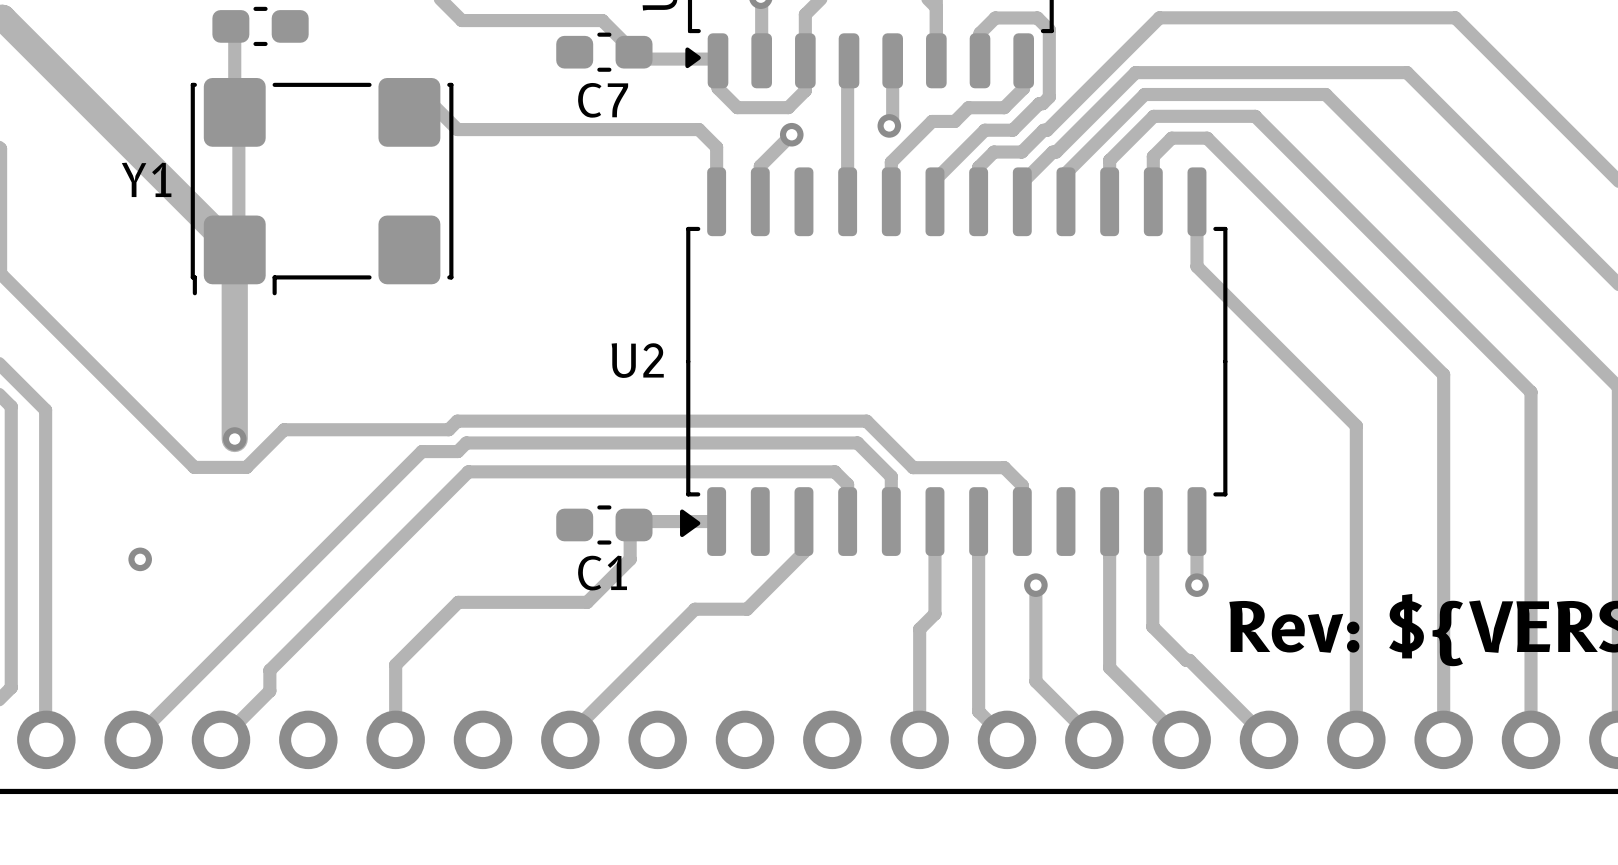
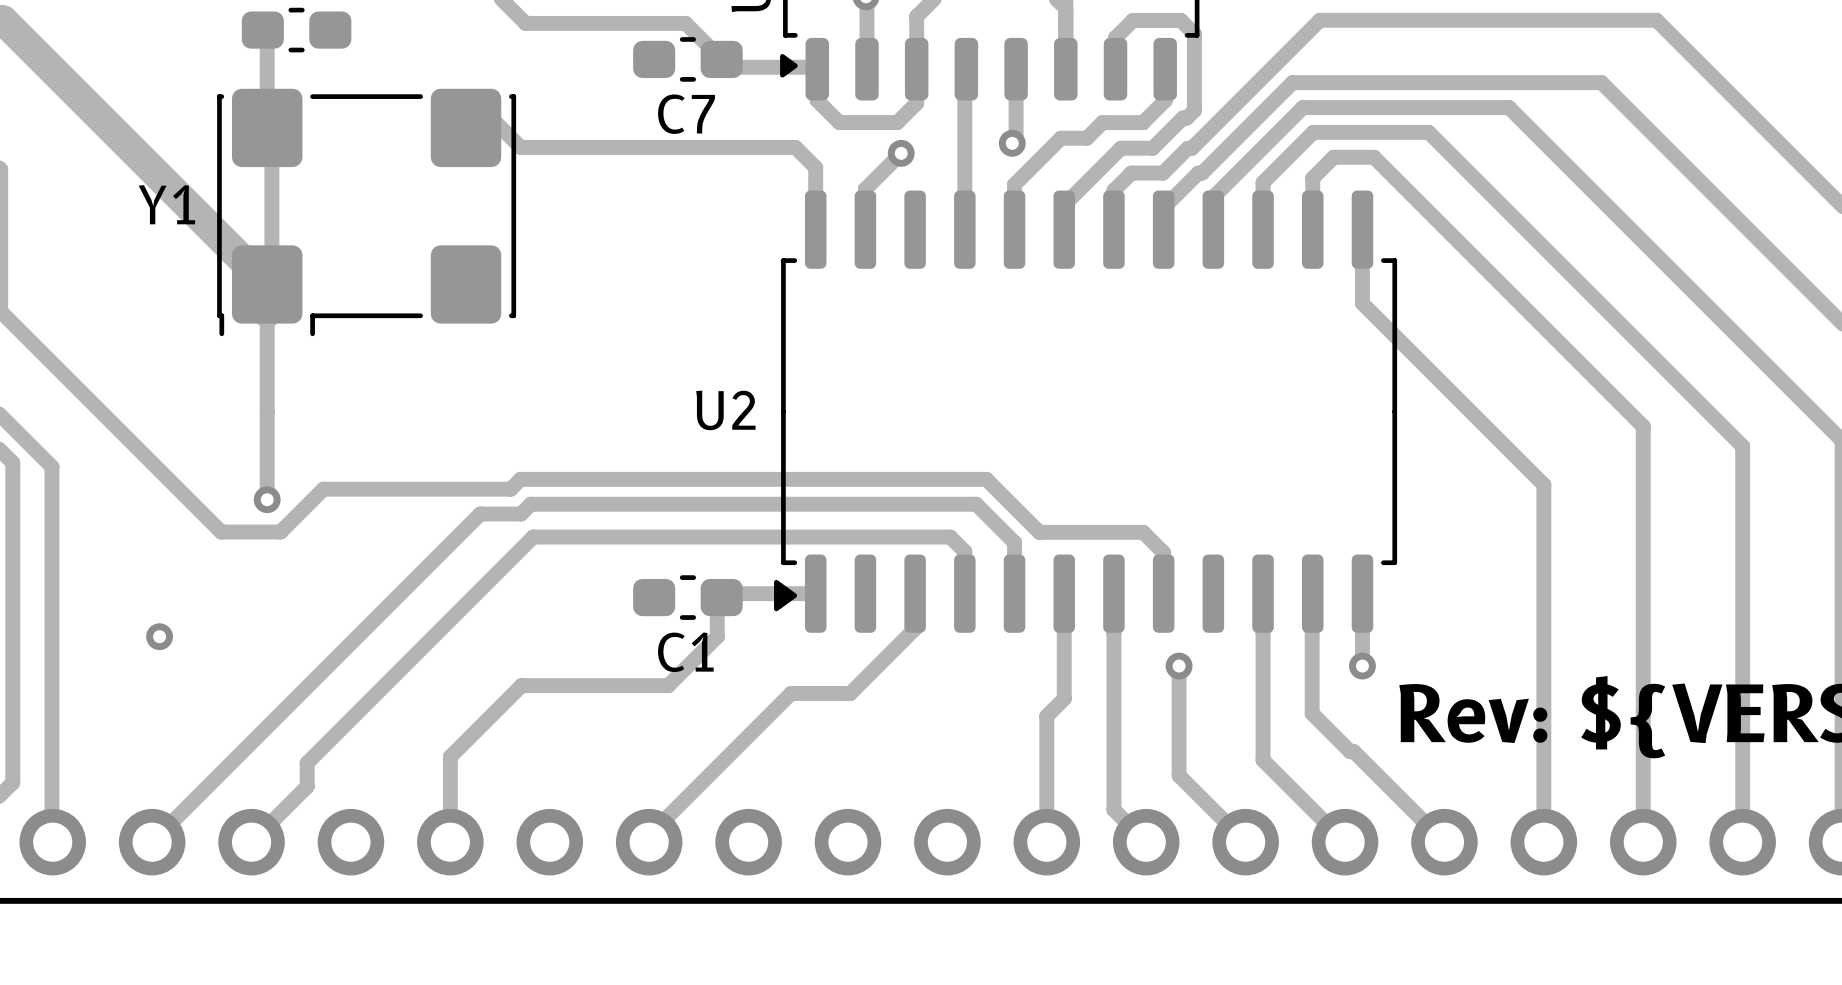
track width: thick (234, 274) (234, 439) -> thin (267, 312) (267, 499)

